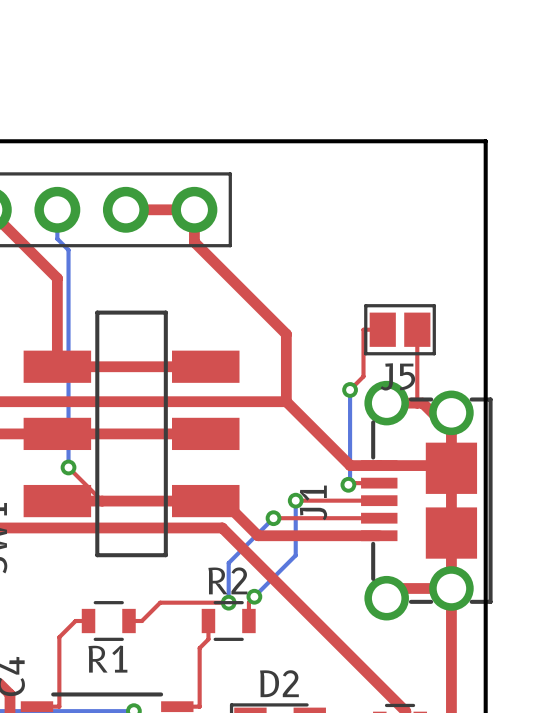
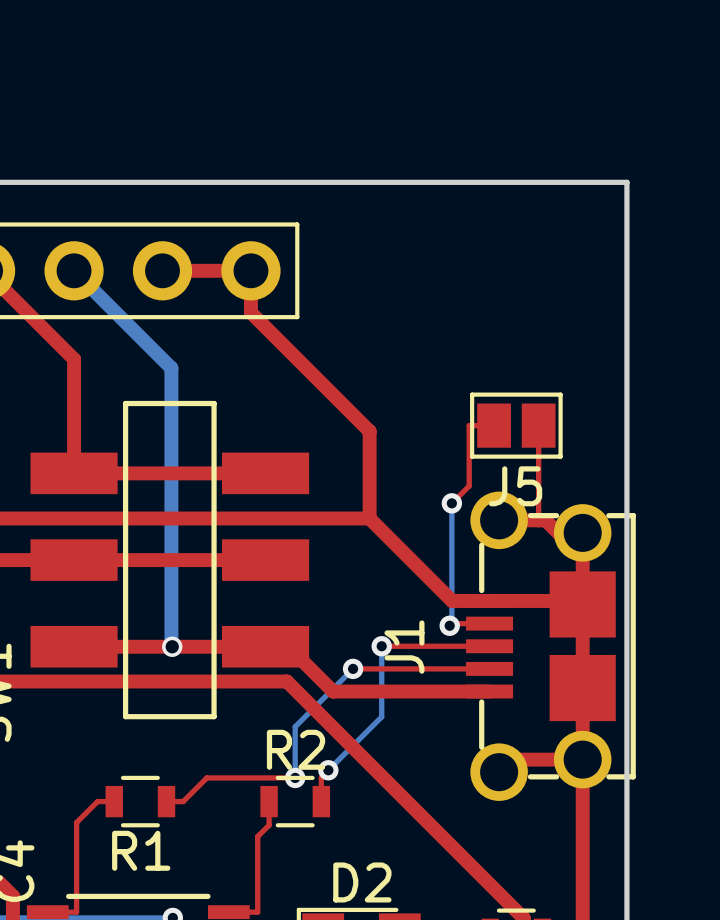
bottom track: (57, 209) (57, 238) (68, 250) (68, 467) -> (74, 270) (171, 368) (172, 646)
top track: (68, 467) (102, 501) -> none
via: (68, 467) -> none
via: none -> (172, 646)

